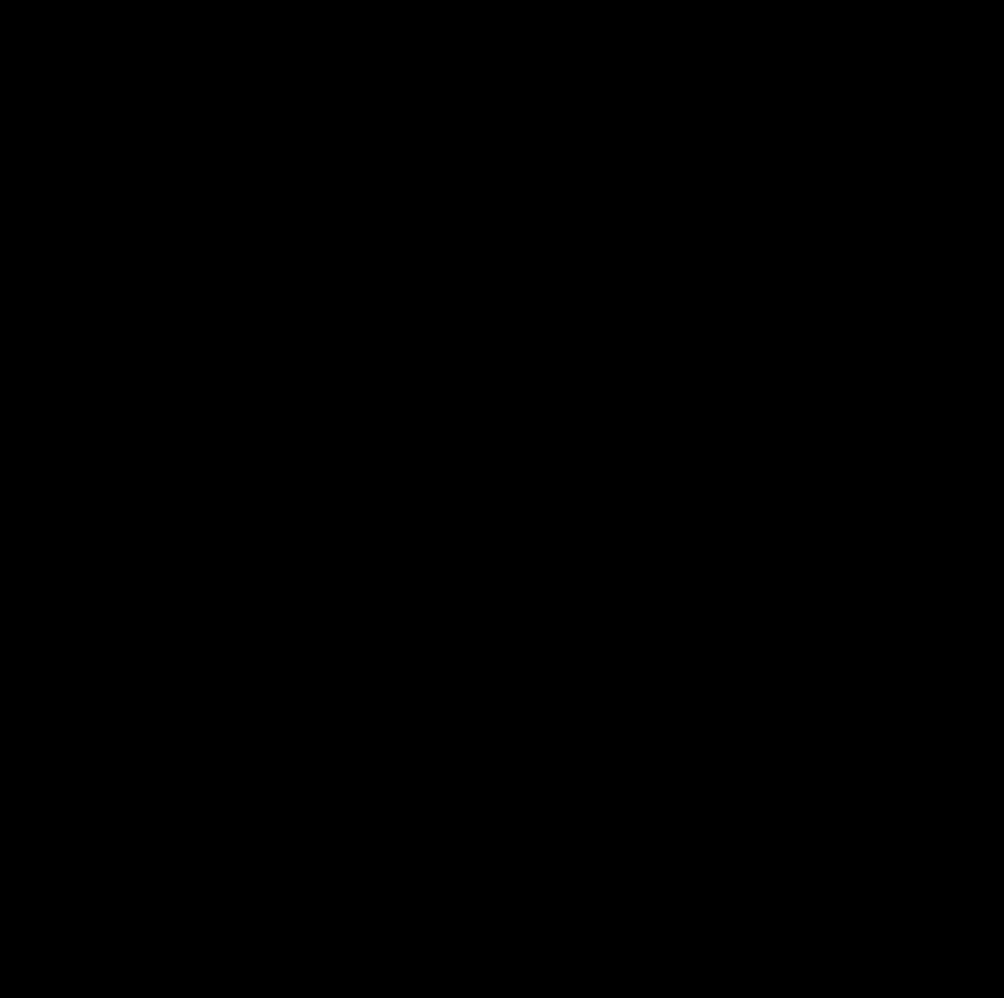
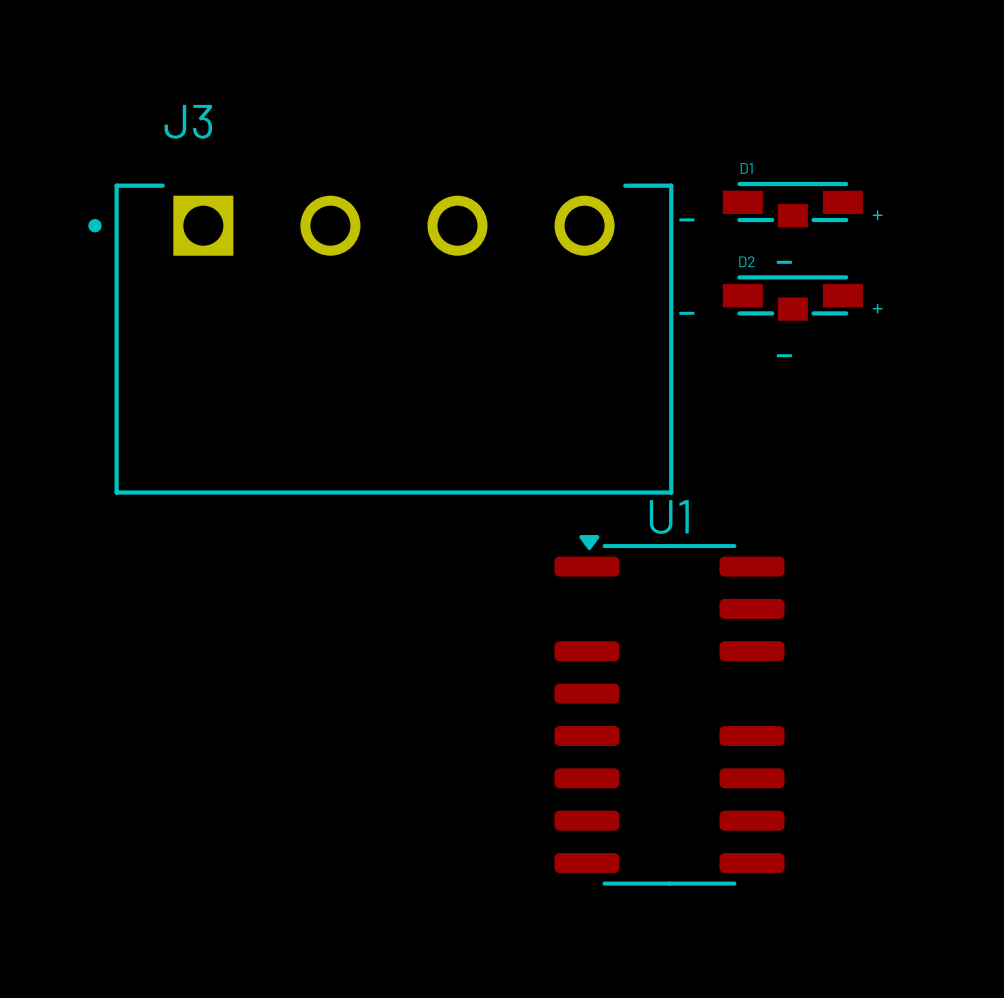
D1: none -> (792, 204)
D2: none -> (792, 298)
J3: none -> (380, 339)
U1: none -> (669, 710)

